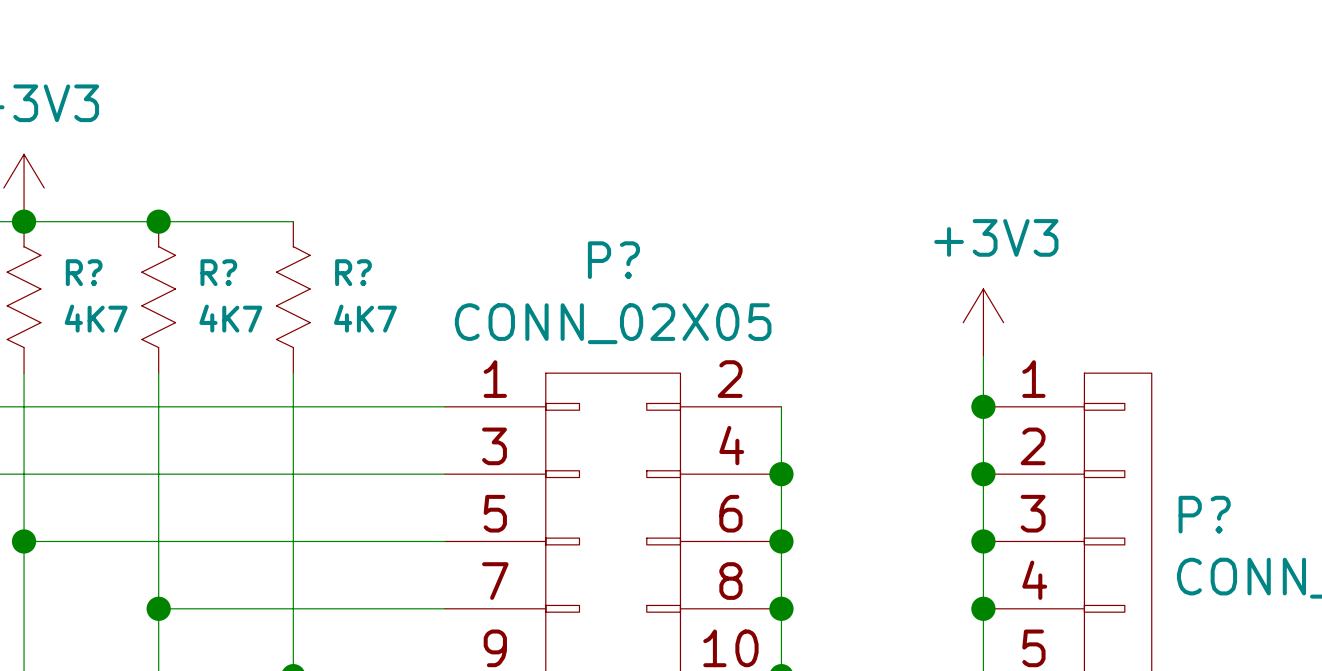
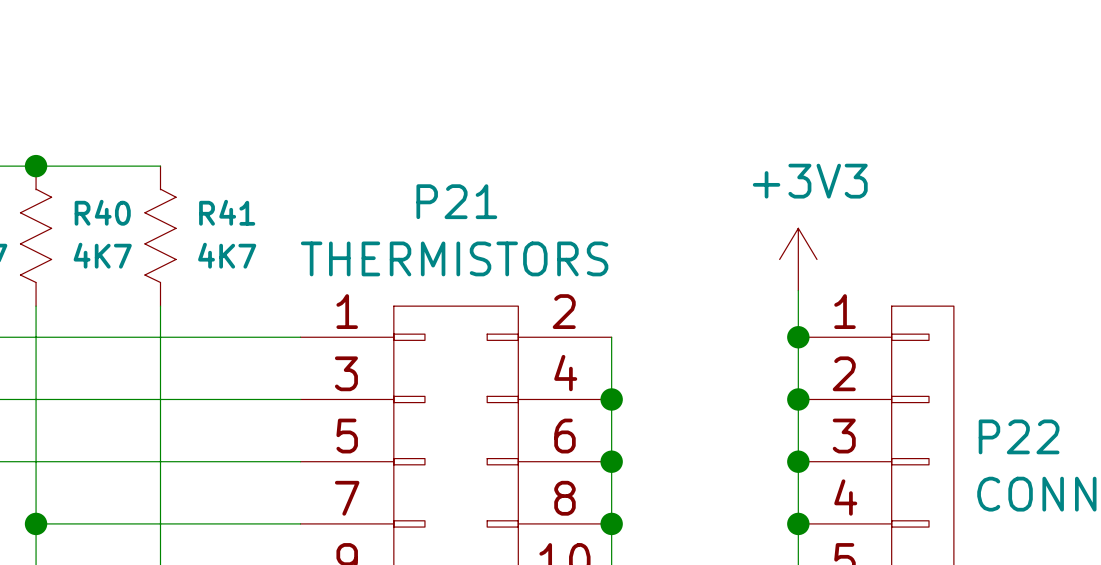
P? name: P? (613, 260) -> P21 (456, 201)
R? name: R? (218, 272) -> R40 (102, 212)
R? name: R? (353, 272) -> R41 (227, 212)
P? value: CONN_02X05 (613, 323) -> THERMISTORS (454, 258)
P? name: P? (1204, 514) -> P22 (1019, 436)

